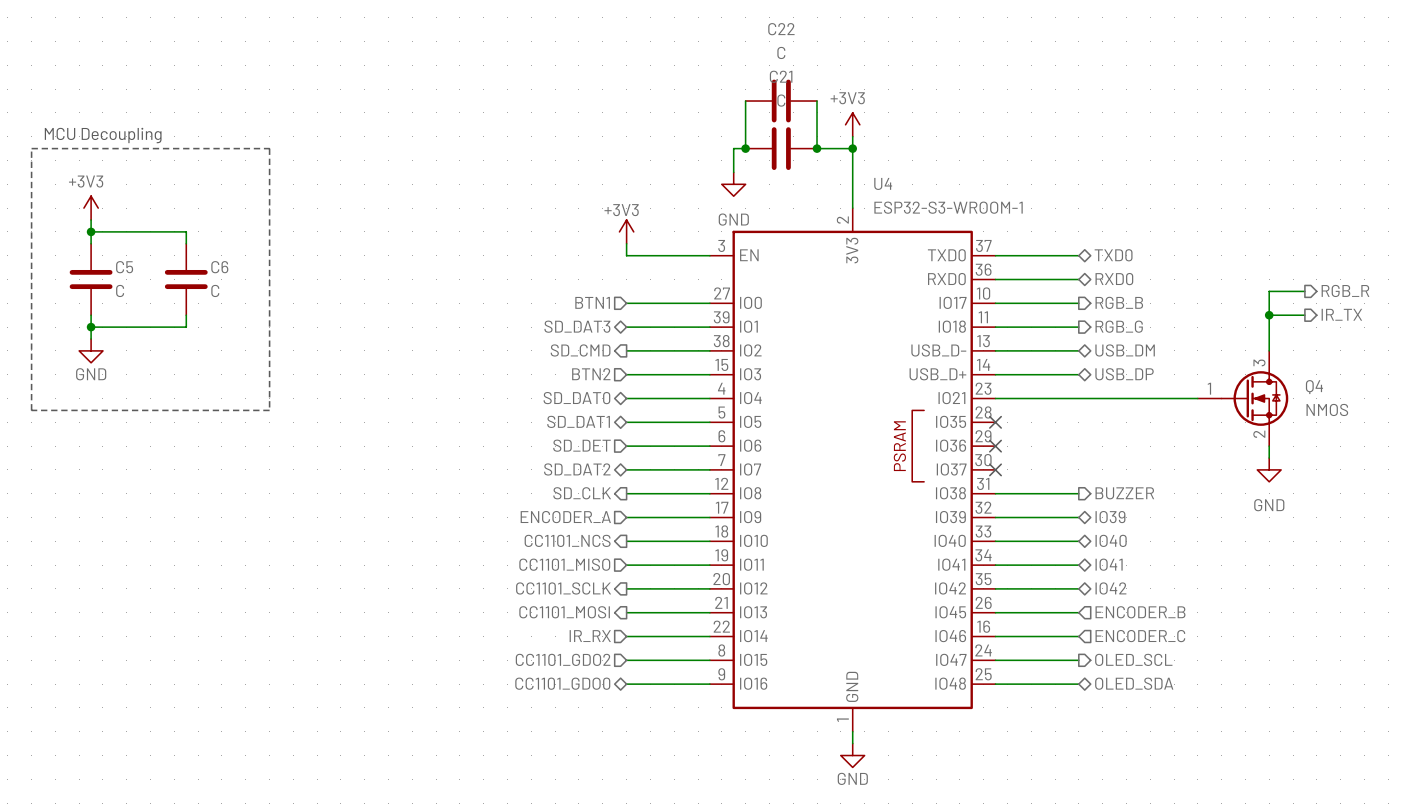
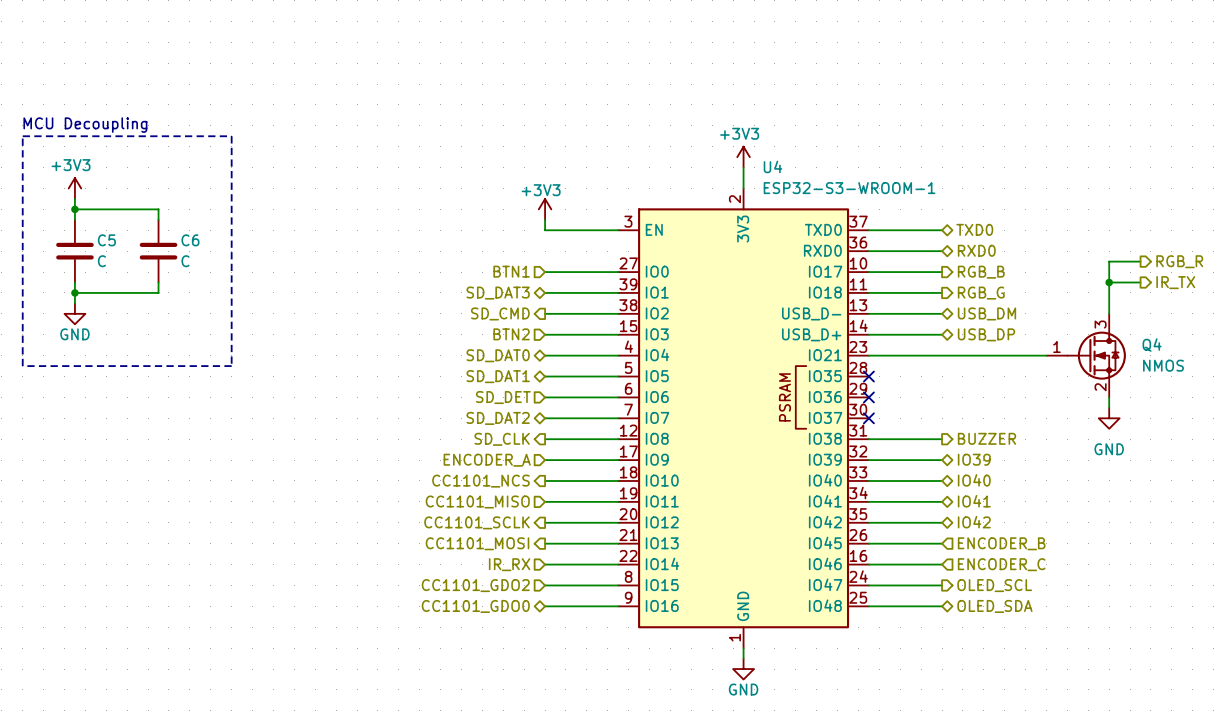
wire: (745, 101) (745, 148) (733, 148) (733, 172) -> none
C22: C (781, 101) -> none
wire: (817, 101) (817, 148) (852, 148) -> none
power symbol position: +3V3 (852, 124) -> +3V3 (743, 157)
junction: (745, 148) -> none
C21: C (781, 148) -> none
junction: (817, 148) -> none
junction: (852, 148) -> none
power symbol: GND (733, 184) -> none

